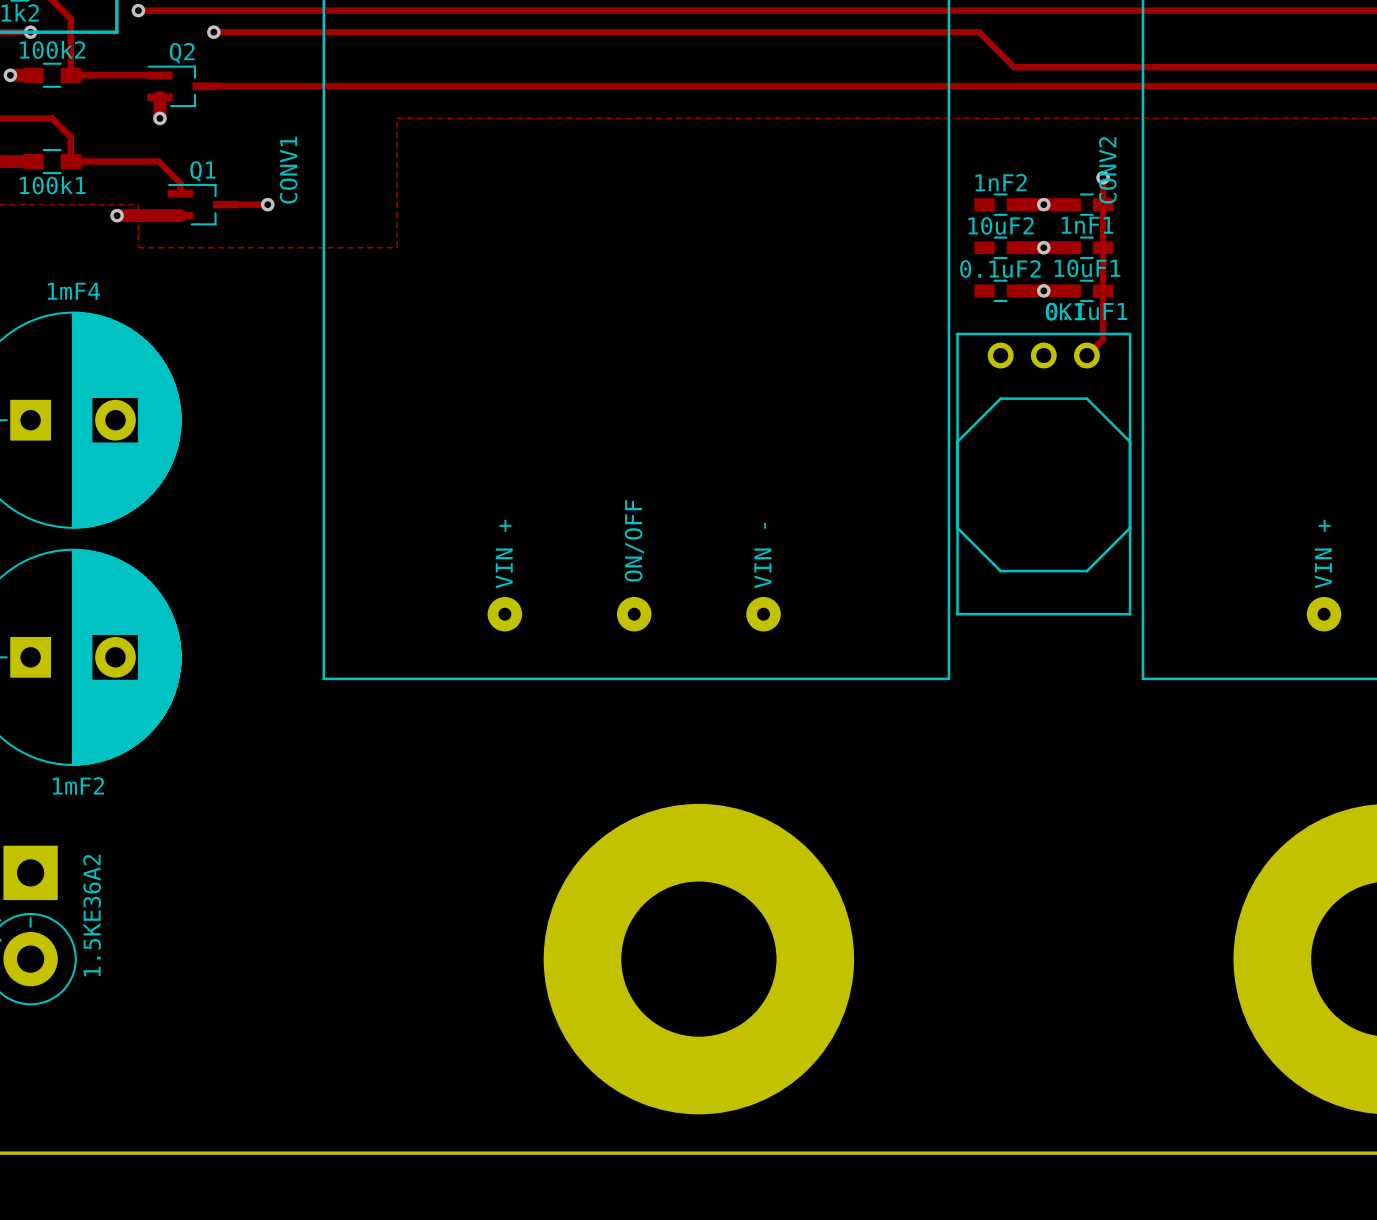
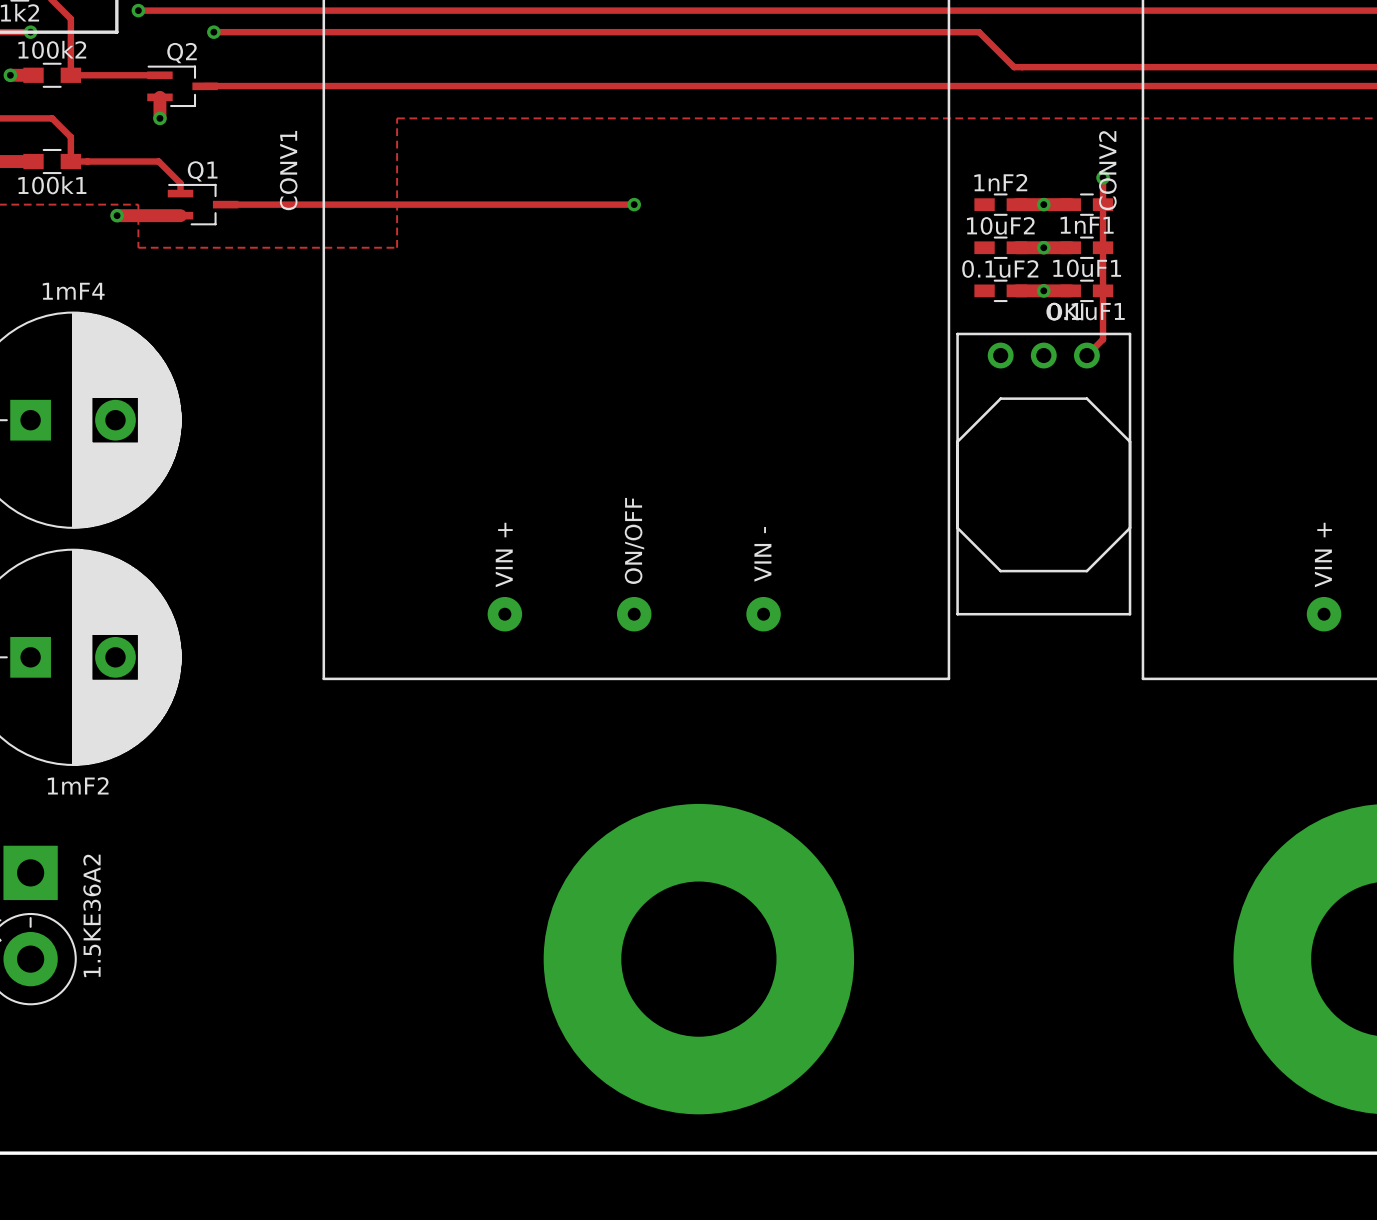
track: none -> (267, 204) (634, 204)
via: (267, 204) -> none
via: none -> (634, 204)

